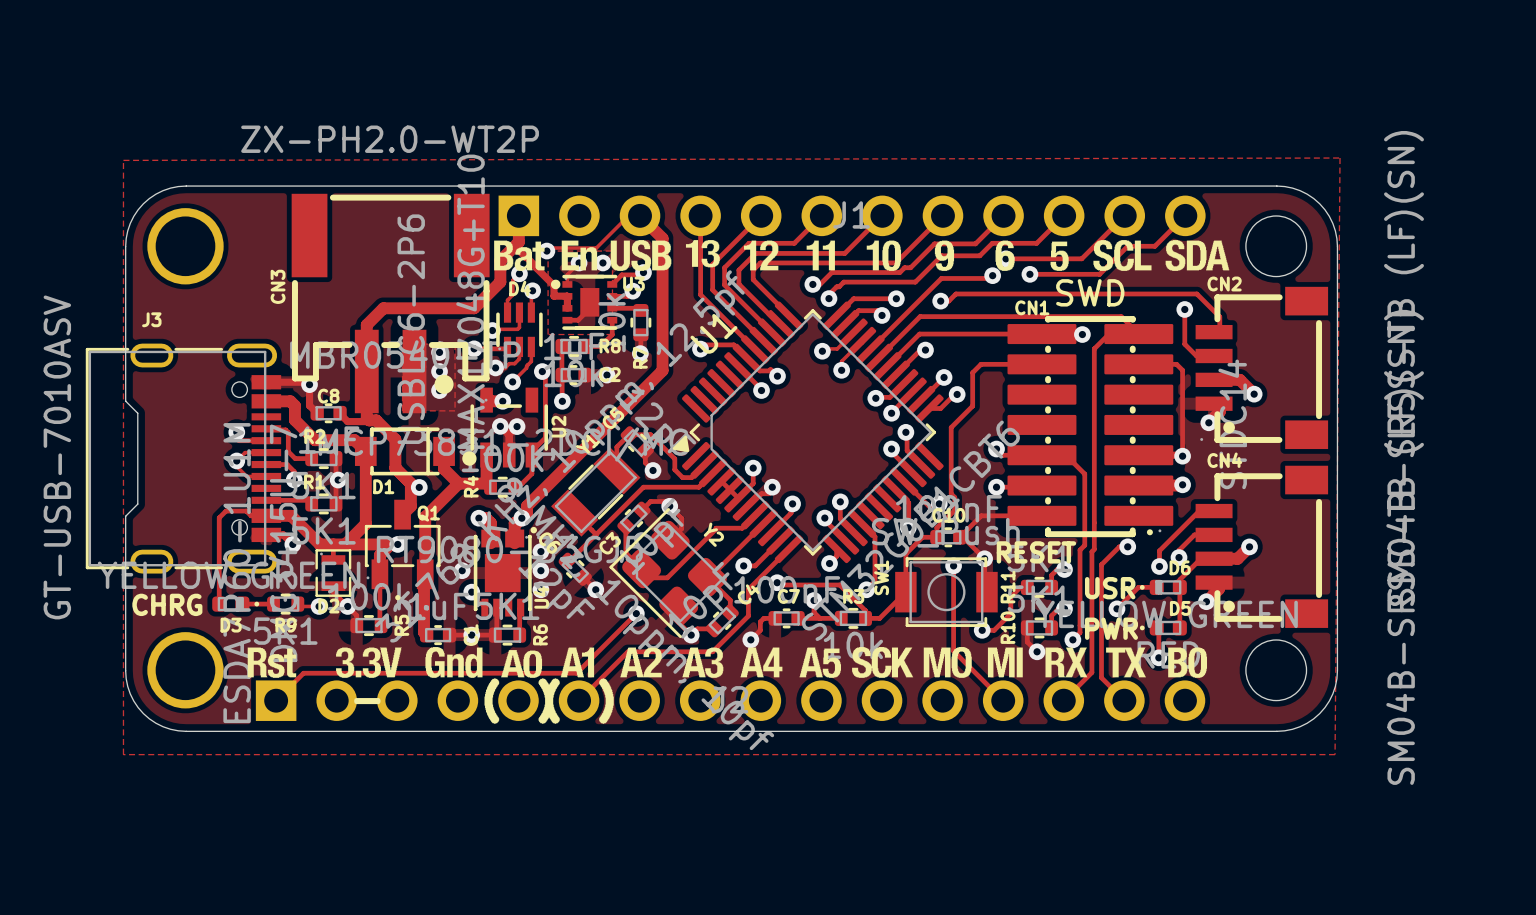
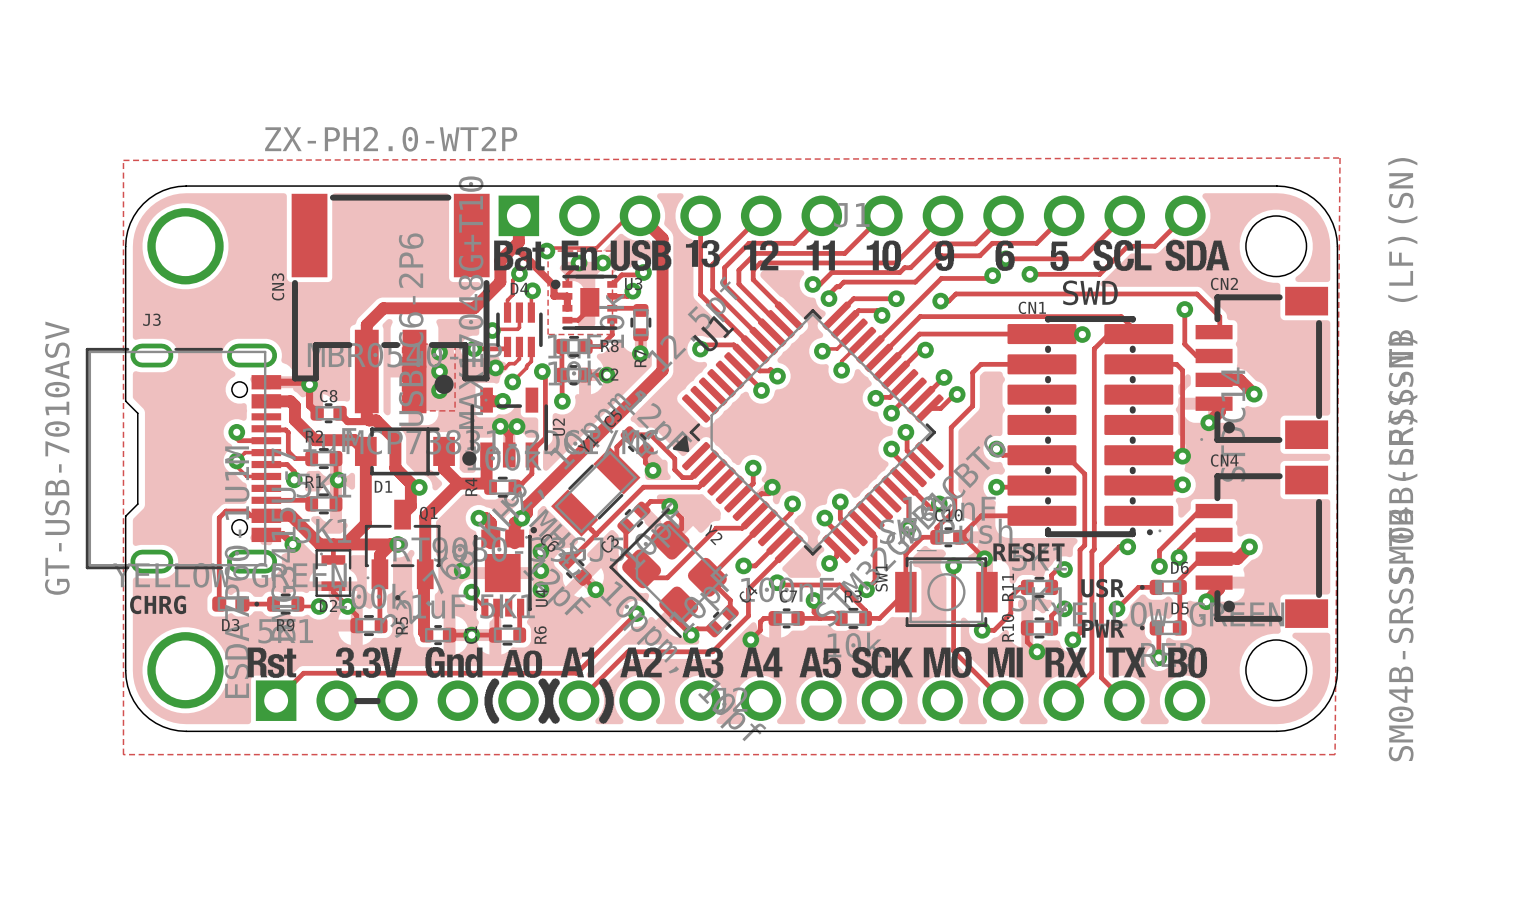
track: (721, 481) (738, 498) -> none

